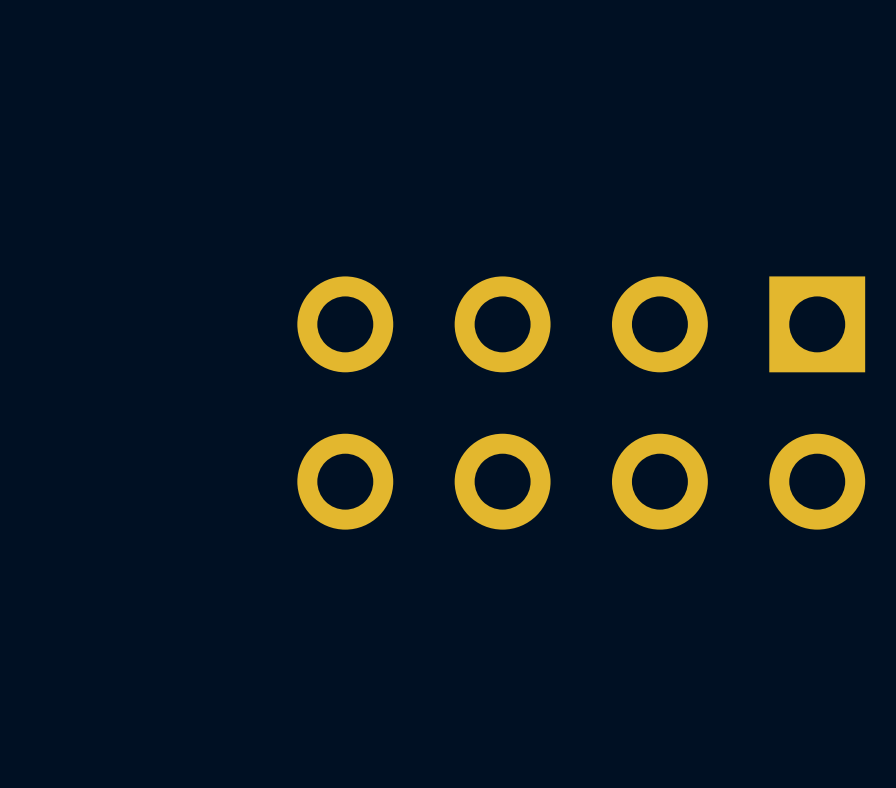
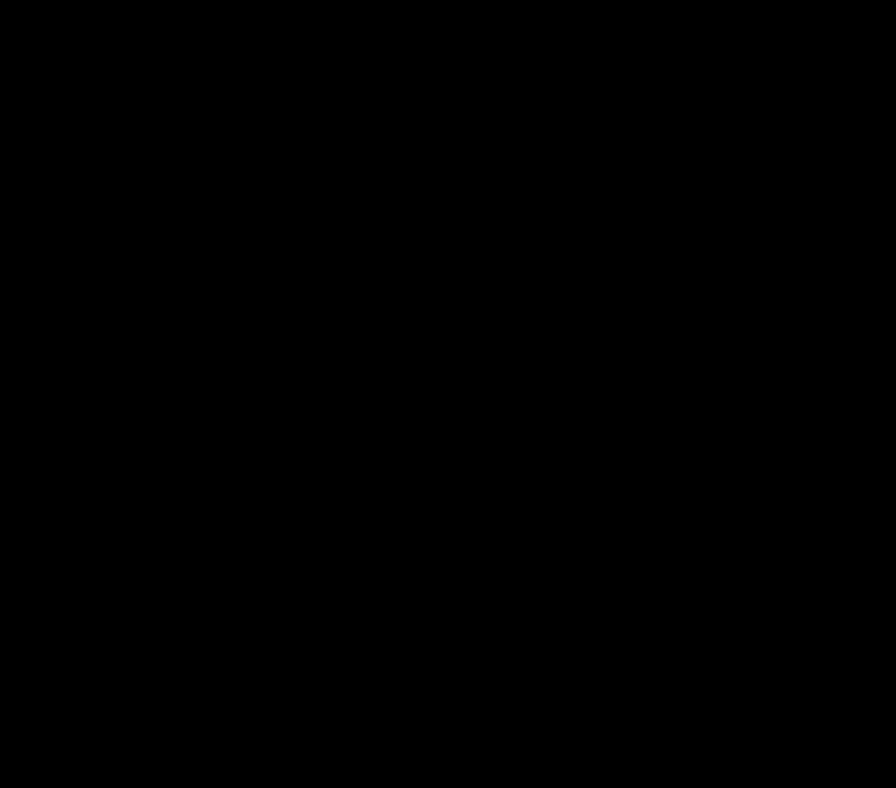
part: (581, 403) -> none

